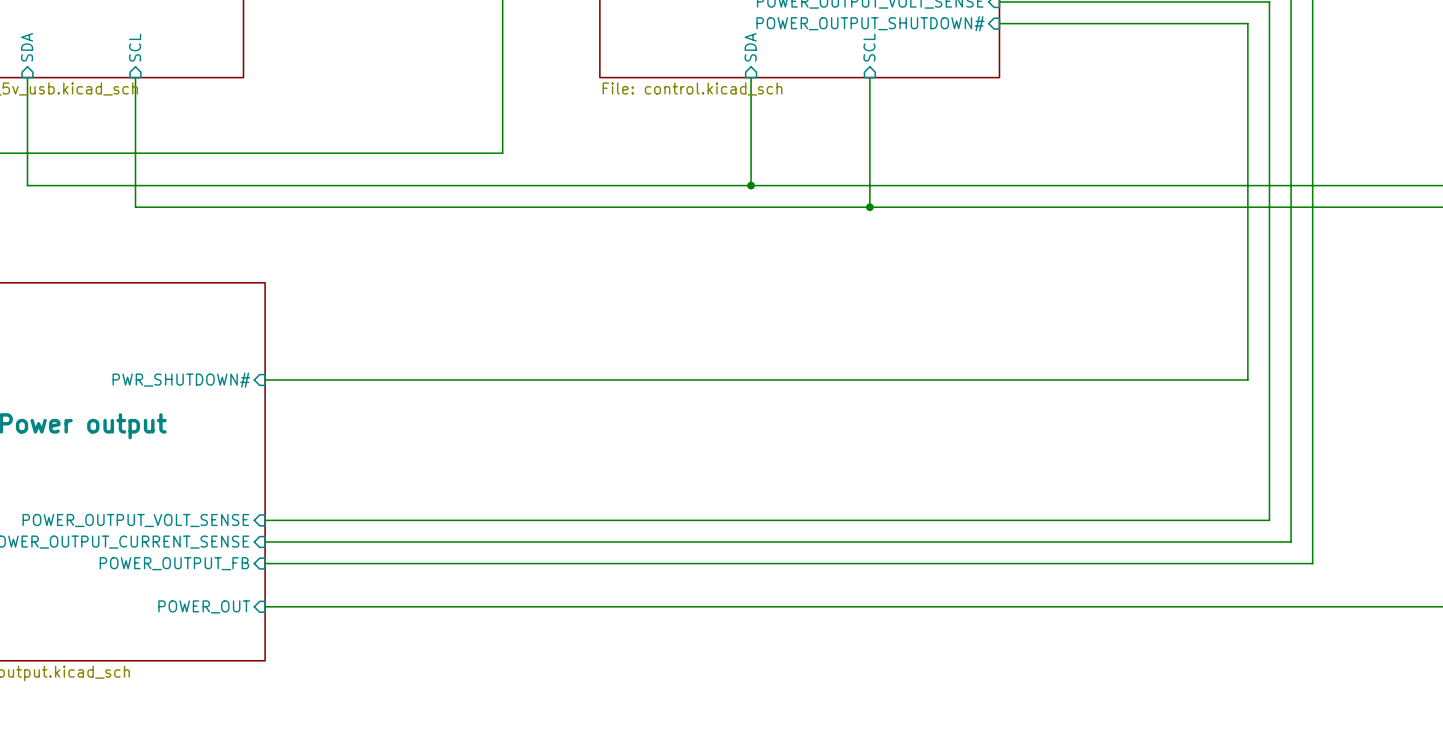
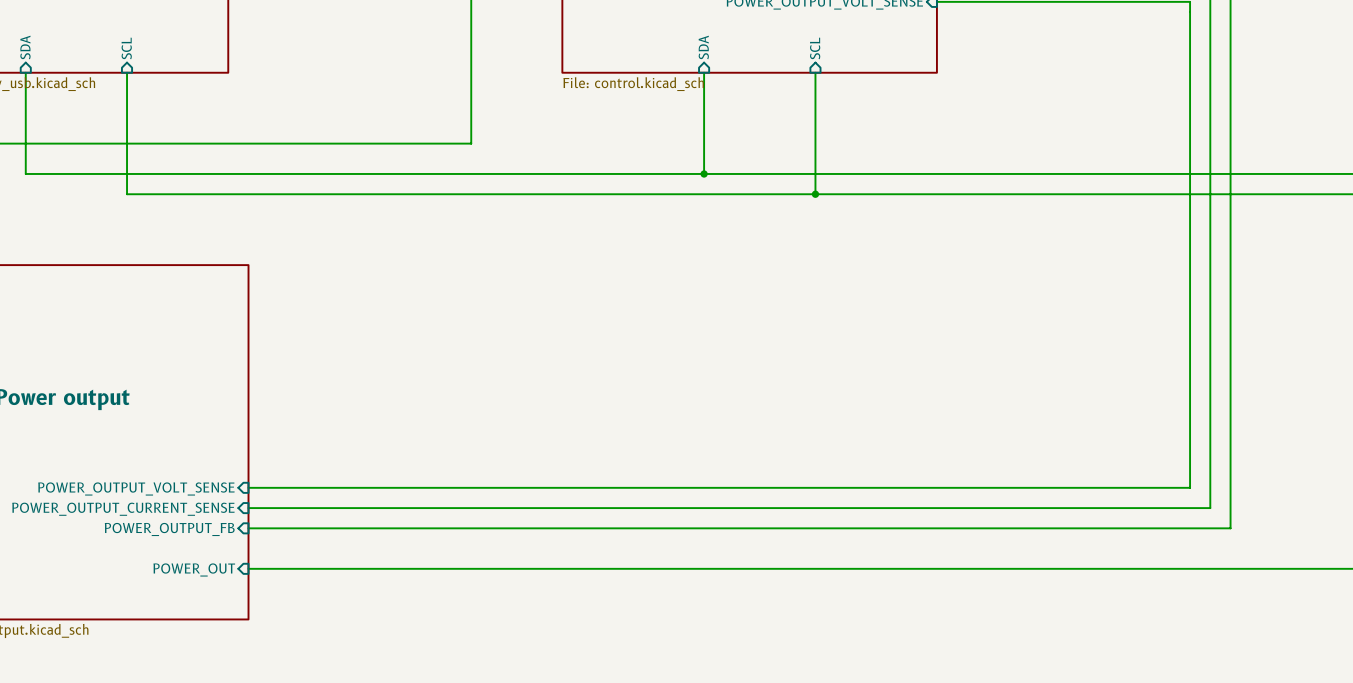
sheet pin: POWER_OUTPUT_SHUTDOWN# (870, 23) -> none
wire: (999, 23) (1247, 23) (1247, 379) (265, 379) -> none
sheet pin: PWR_SHUTDOWN# (181, 380) -> none

